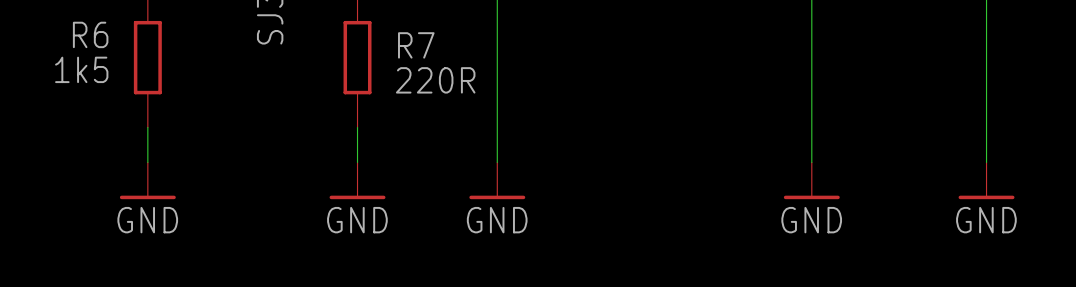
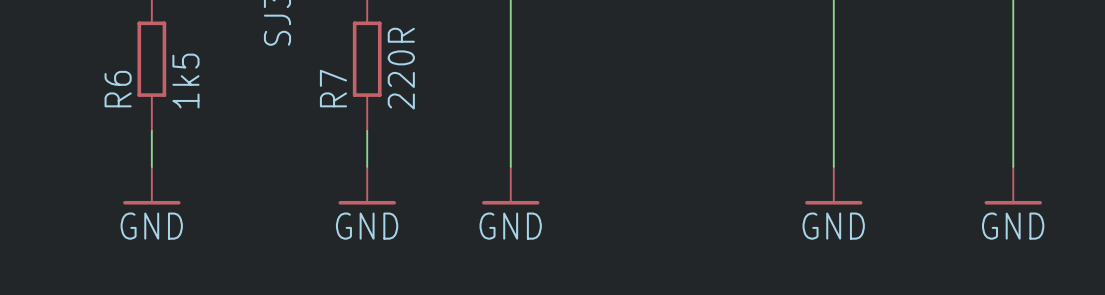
R6 name rotation: 0° (90, 34) -> 90° counterclockwise (118, 89)
R6 name position: R6 (90, 34) -> R6 (118, 89)
R7 name rotation: 0° (416, 45) -> 90° counterclockwise (333, 88)
R7 name position: R7 (416, 45) -> R7 (333, 88)
R6 value rotation: 0° (81, 69) -> 90° counterclockwise (185, 81)
R6 value position: 1k5 (81, 69) -> 1k5 (185, 81)
R7 value rotation: 0° (435, 80) -> 90° counterclockwise (401, 68)

